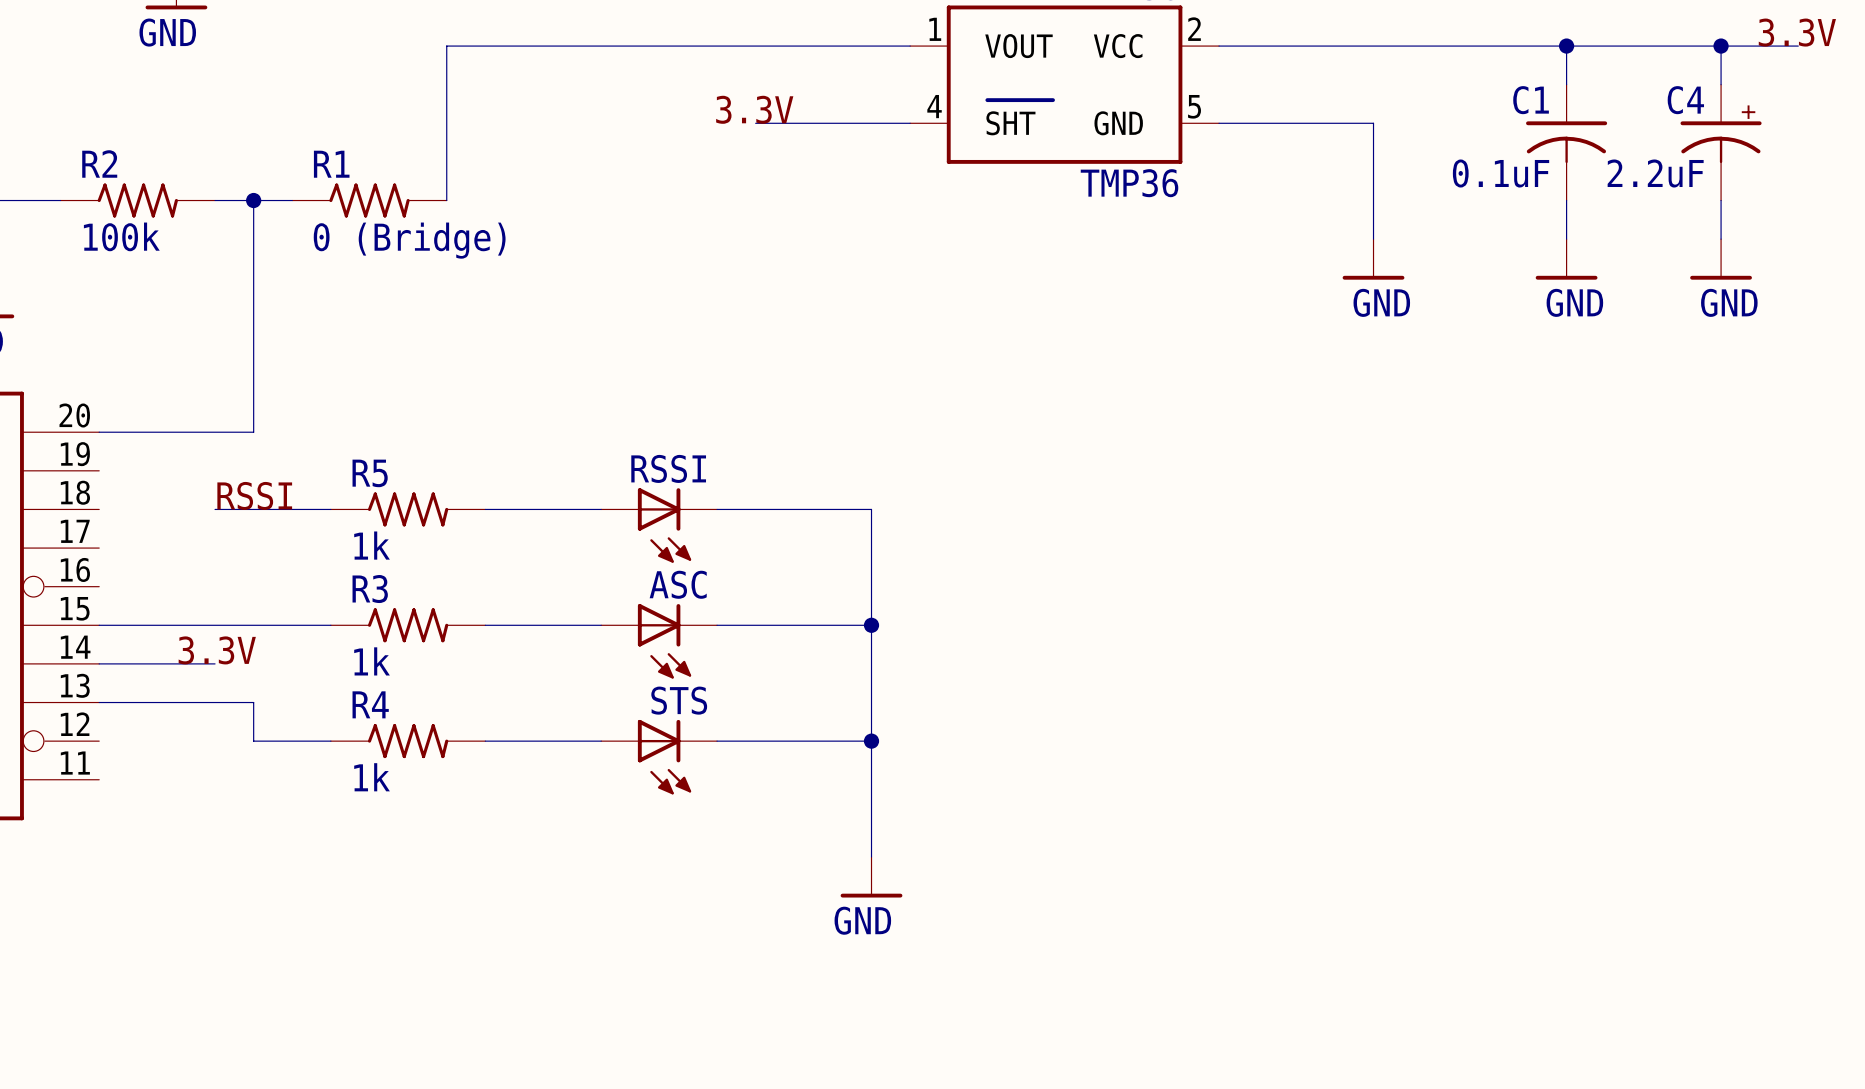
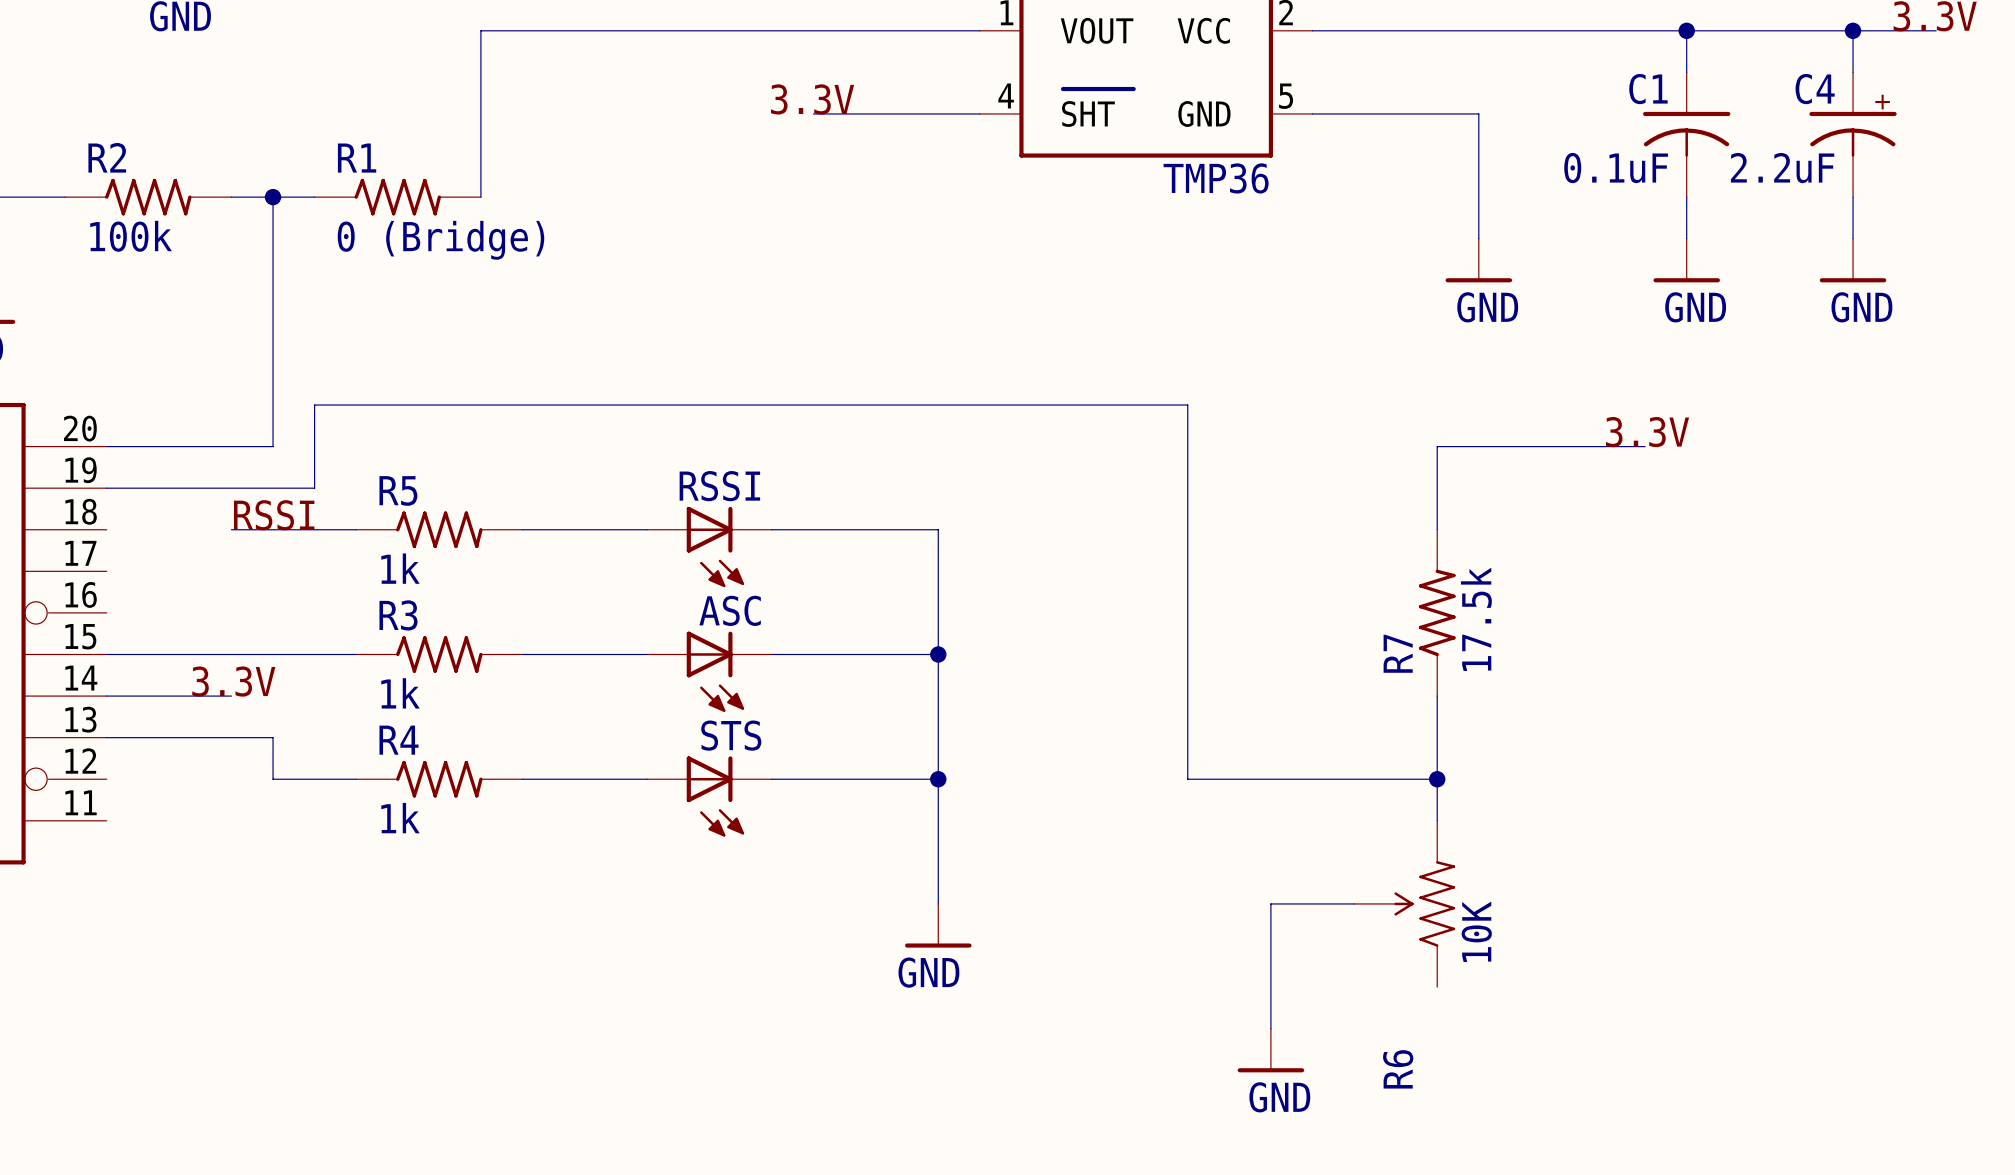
label: none -> 3.3V (1647, 432)
wire: none -> (1645, 446) (1437, 446) (1437, 529)
wire: none -> (106, 488) (314, 488) (314, 405) (1187, 405) (1187, 779) (1437, 779)
R7: none -> 17.5k (1437, 612)
wire: none -> (1437, 696) (1437, 820)
junction: none -> (1437, 779)
wire: none -> (1354, 903) (1270, 903) (1270, 1028)
R6: none -> 10K (1404, 903)
power symbol: none -> GND (1270, 1050)

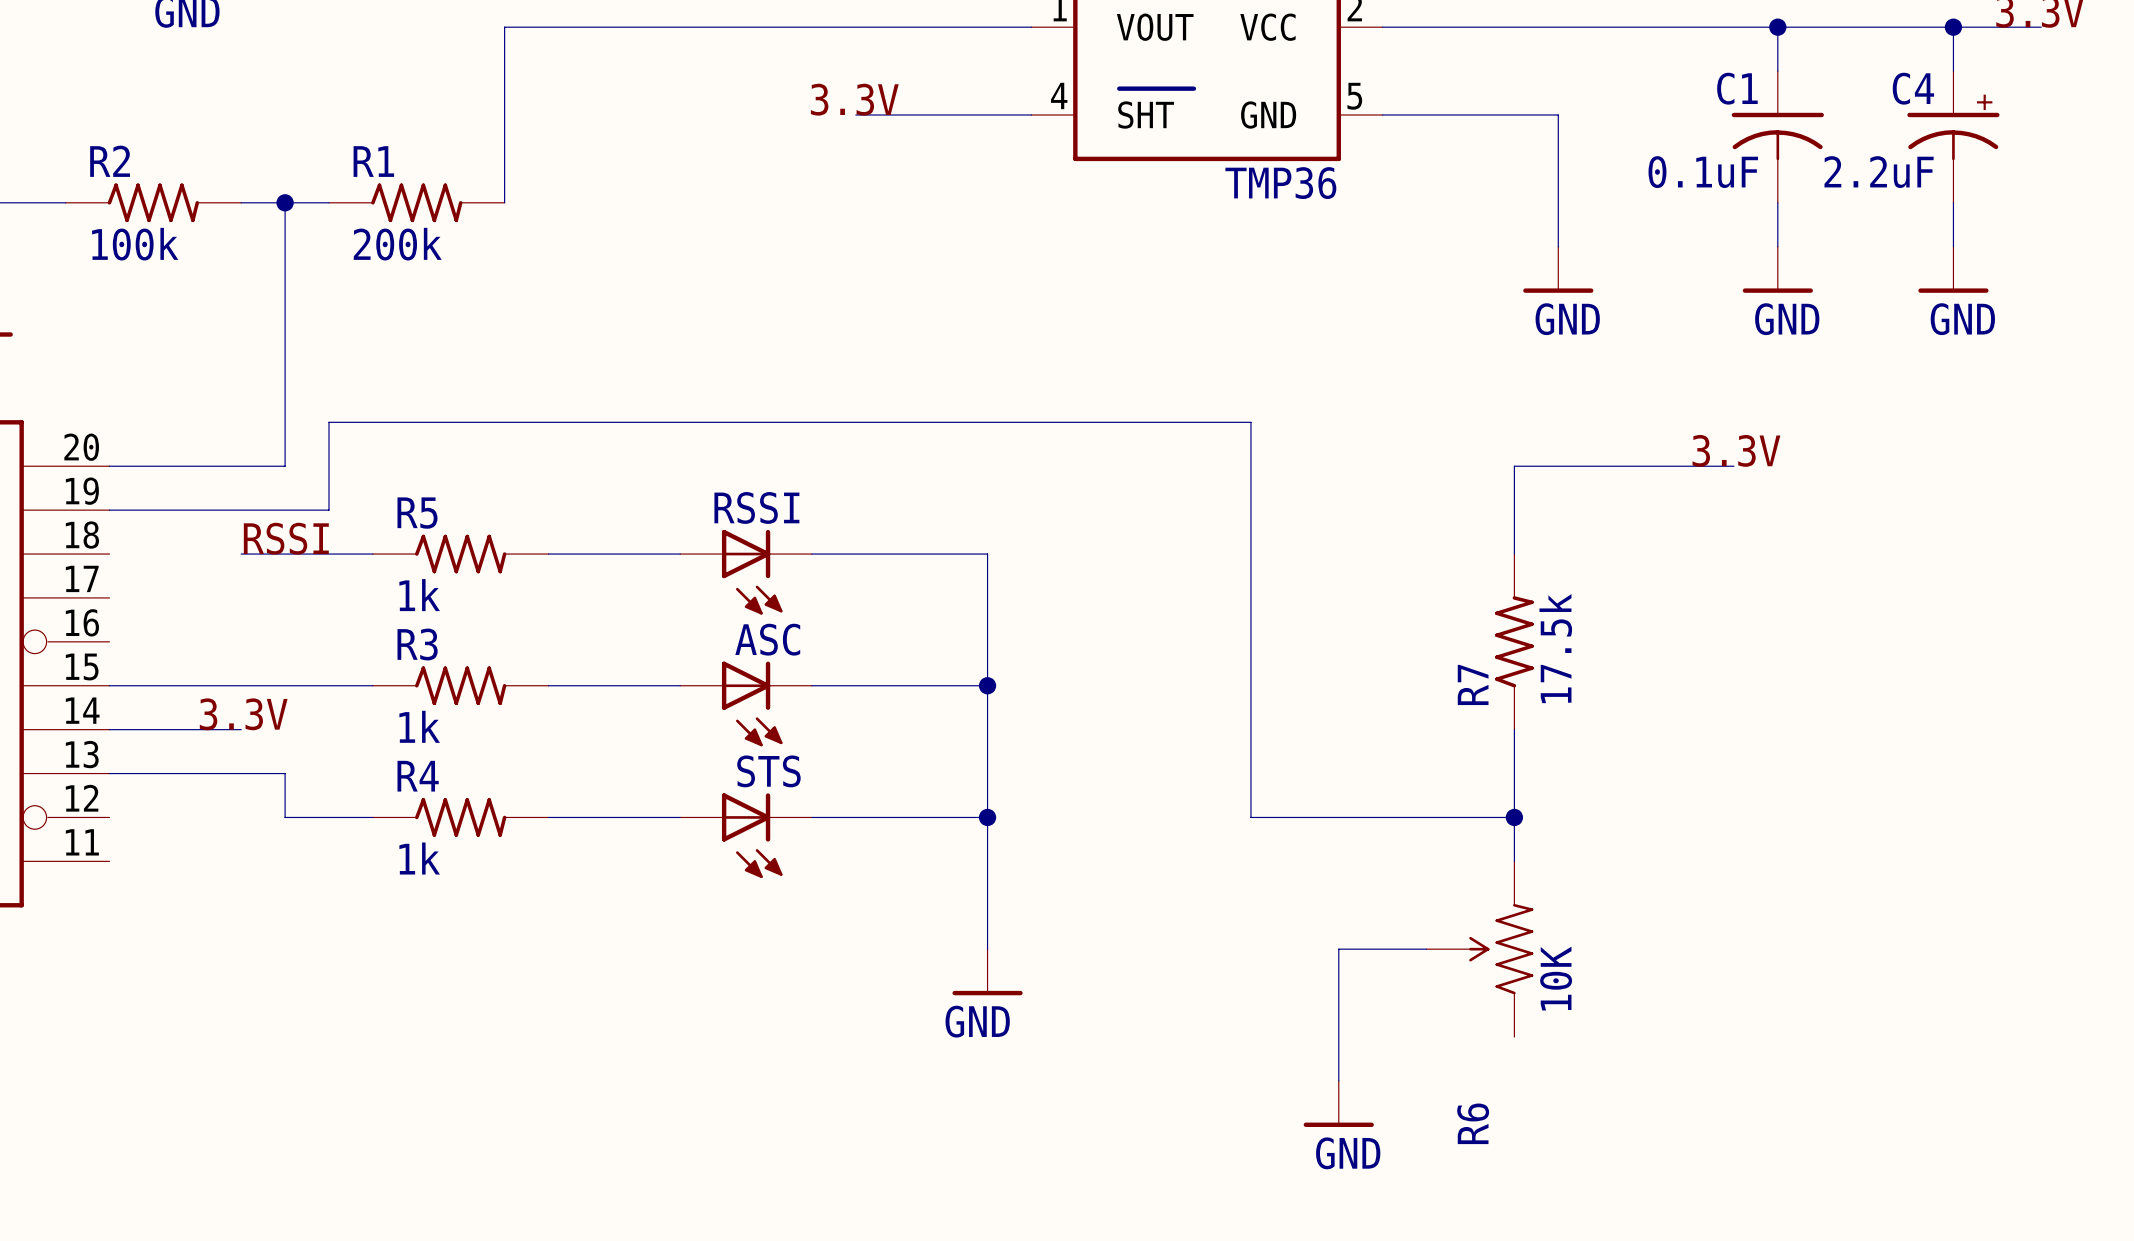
R1 value: 0 (Bridge) (440, 240) -> 200k (397, 244)

